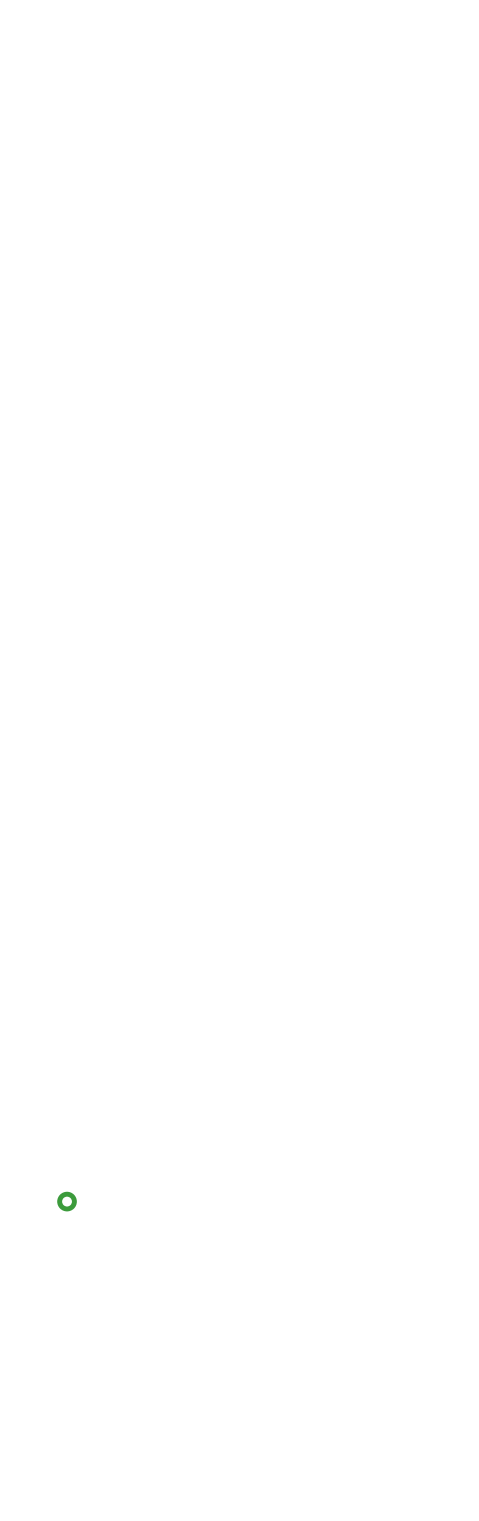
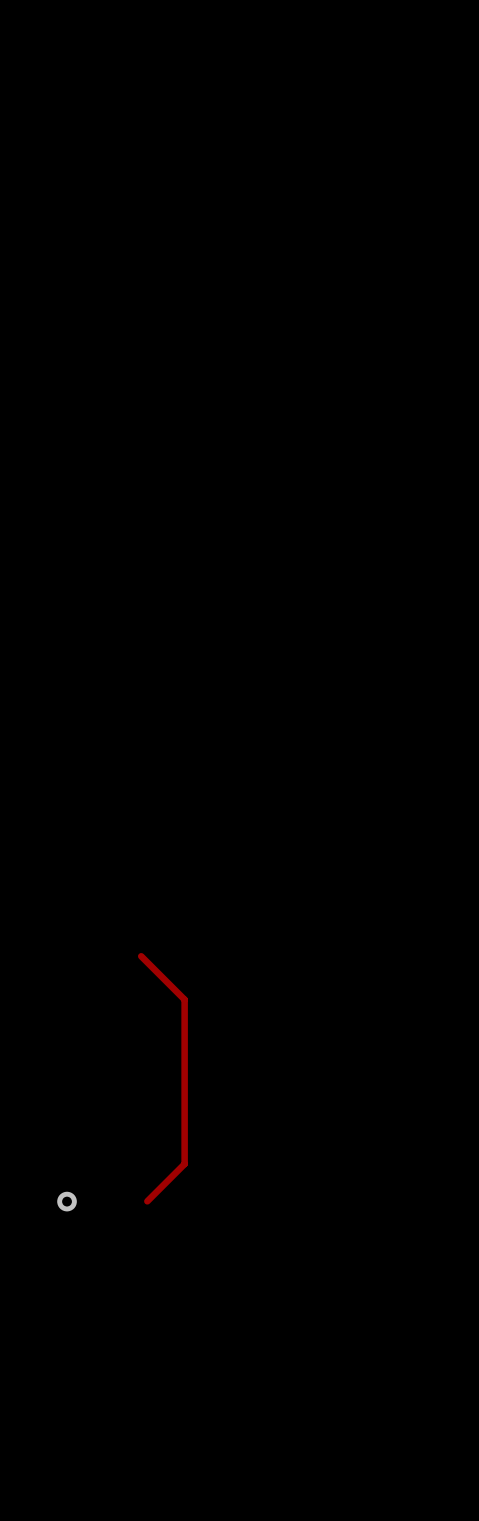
track: none -> (141, 956) (184, 999) (184, 1164) (147, 1201)

